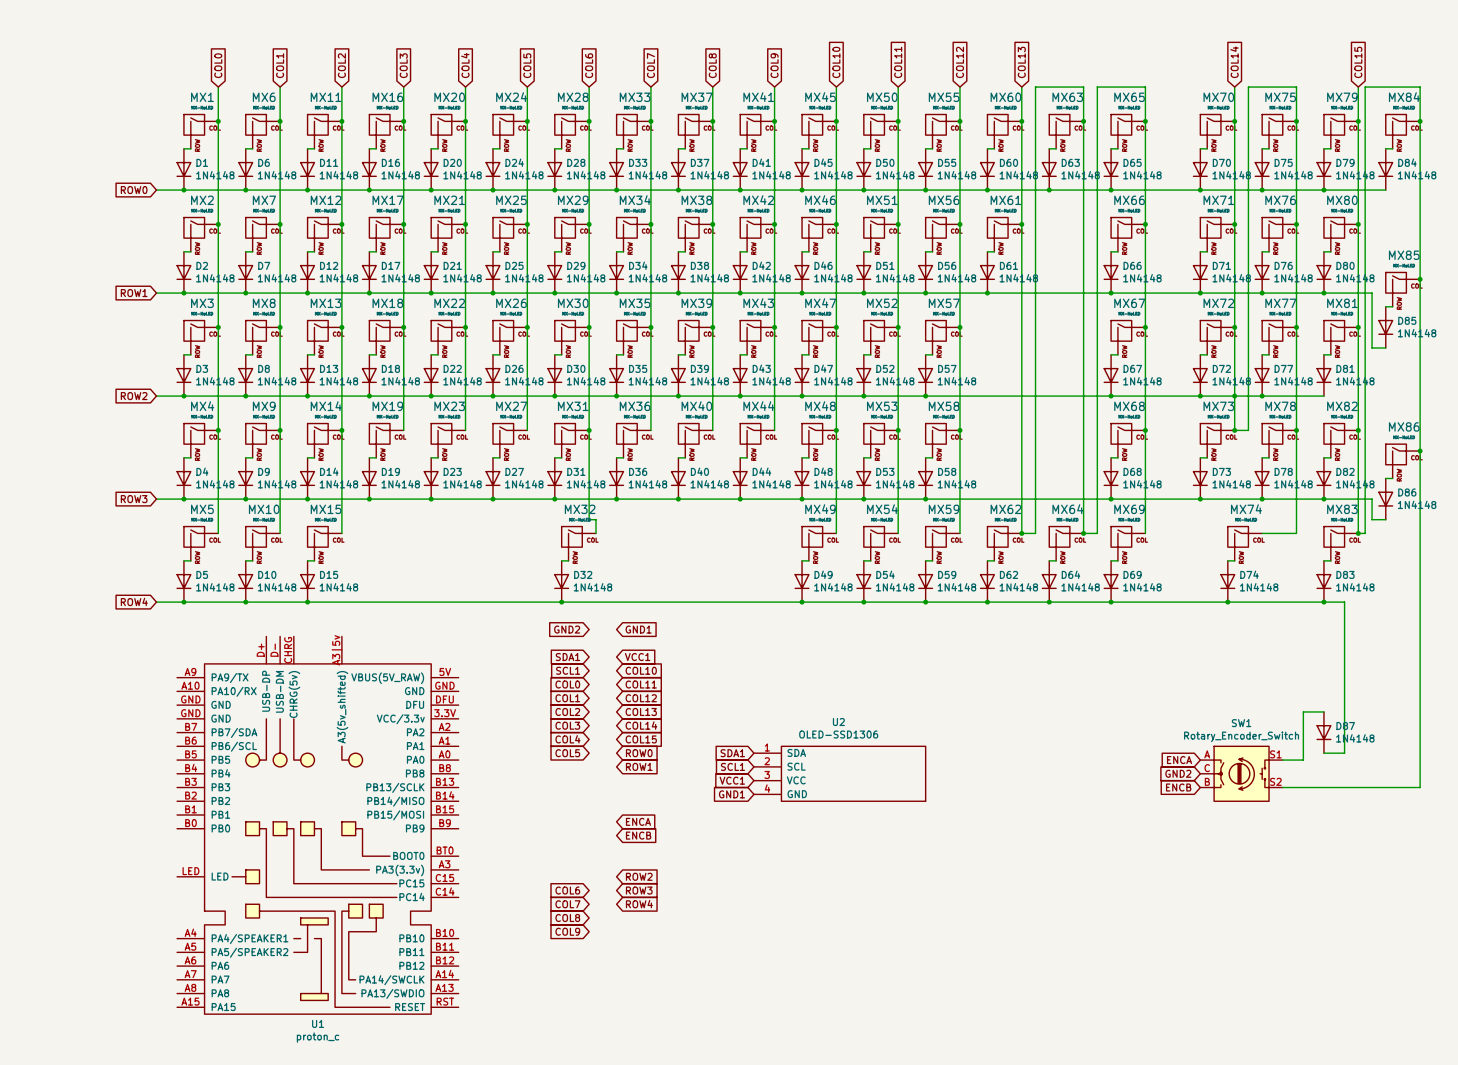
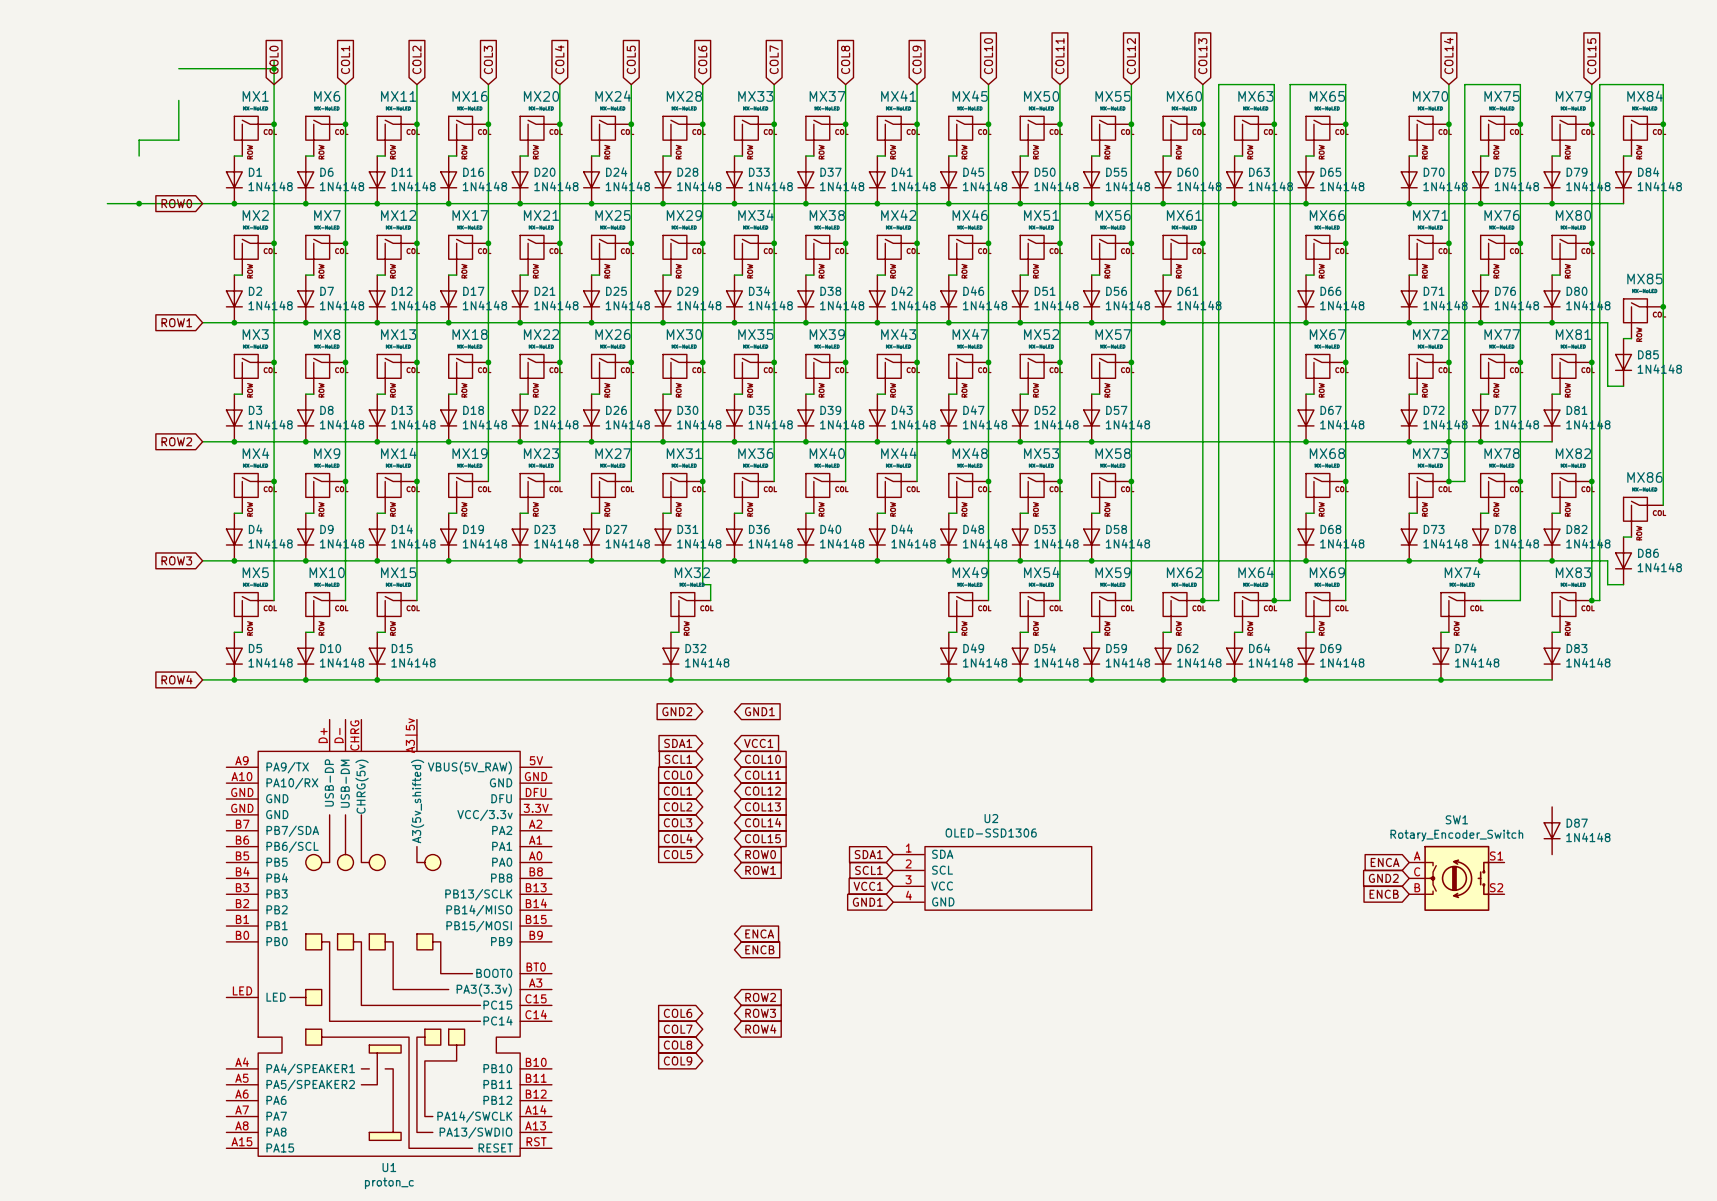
wire: none -> (274, 60) (274, 84)
wire: none -> (178, 68) (274, 68)
junction: none -> (274, 68)
wire: none -> (178, 100) (178, 140) (139, 140) (139, 156)
wire: none -> (107, 203) (202, 203)
junction: none -> (139, 203)
wire: (1420, 451) (1420, 787) (1282, 787) -> none
junction: (1420, 451) -> none
wire: (1323, 602) (1344, 602) (1344, 753) (1323, 753) -> none
junction: (1323, 602) -> none
wire: (1323, 711) (1303, 711) (1303, 760) (1282, 760) -> none

